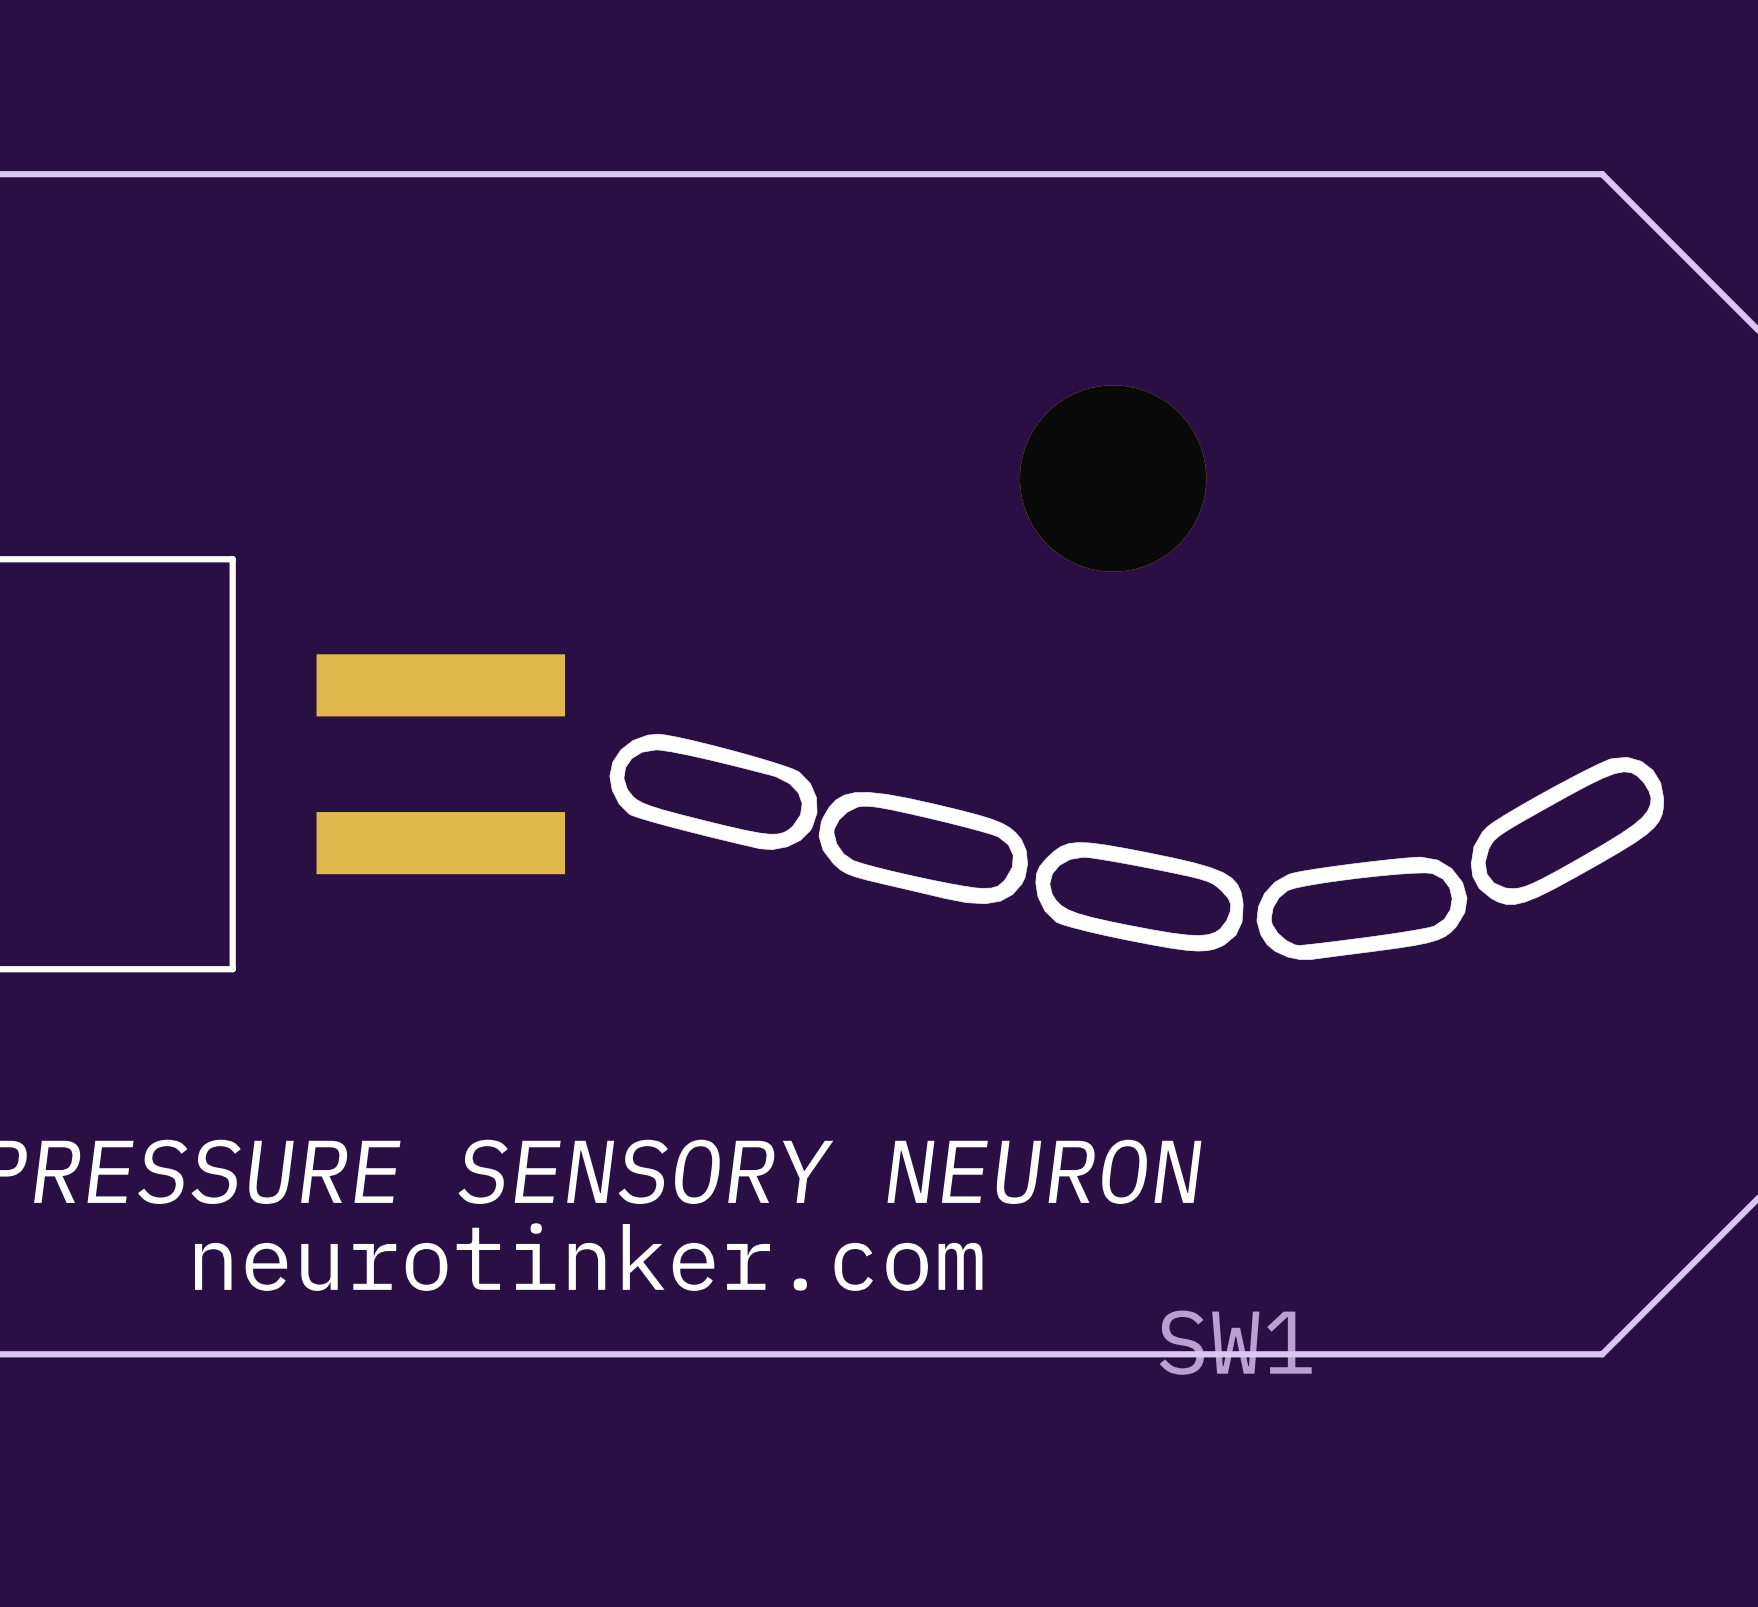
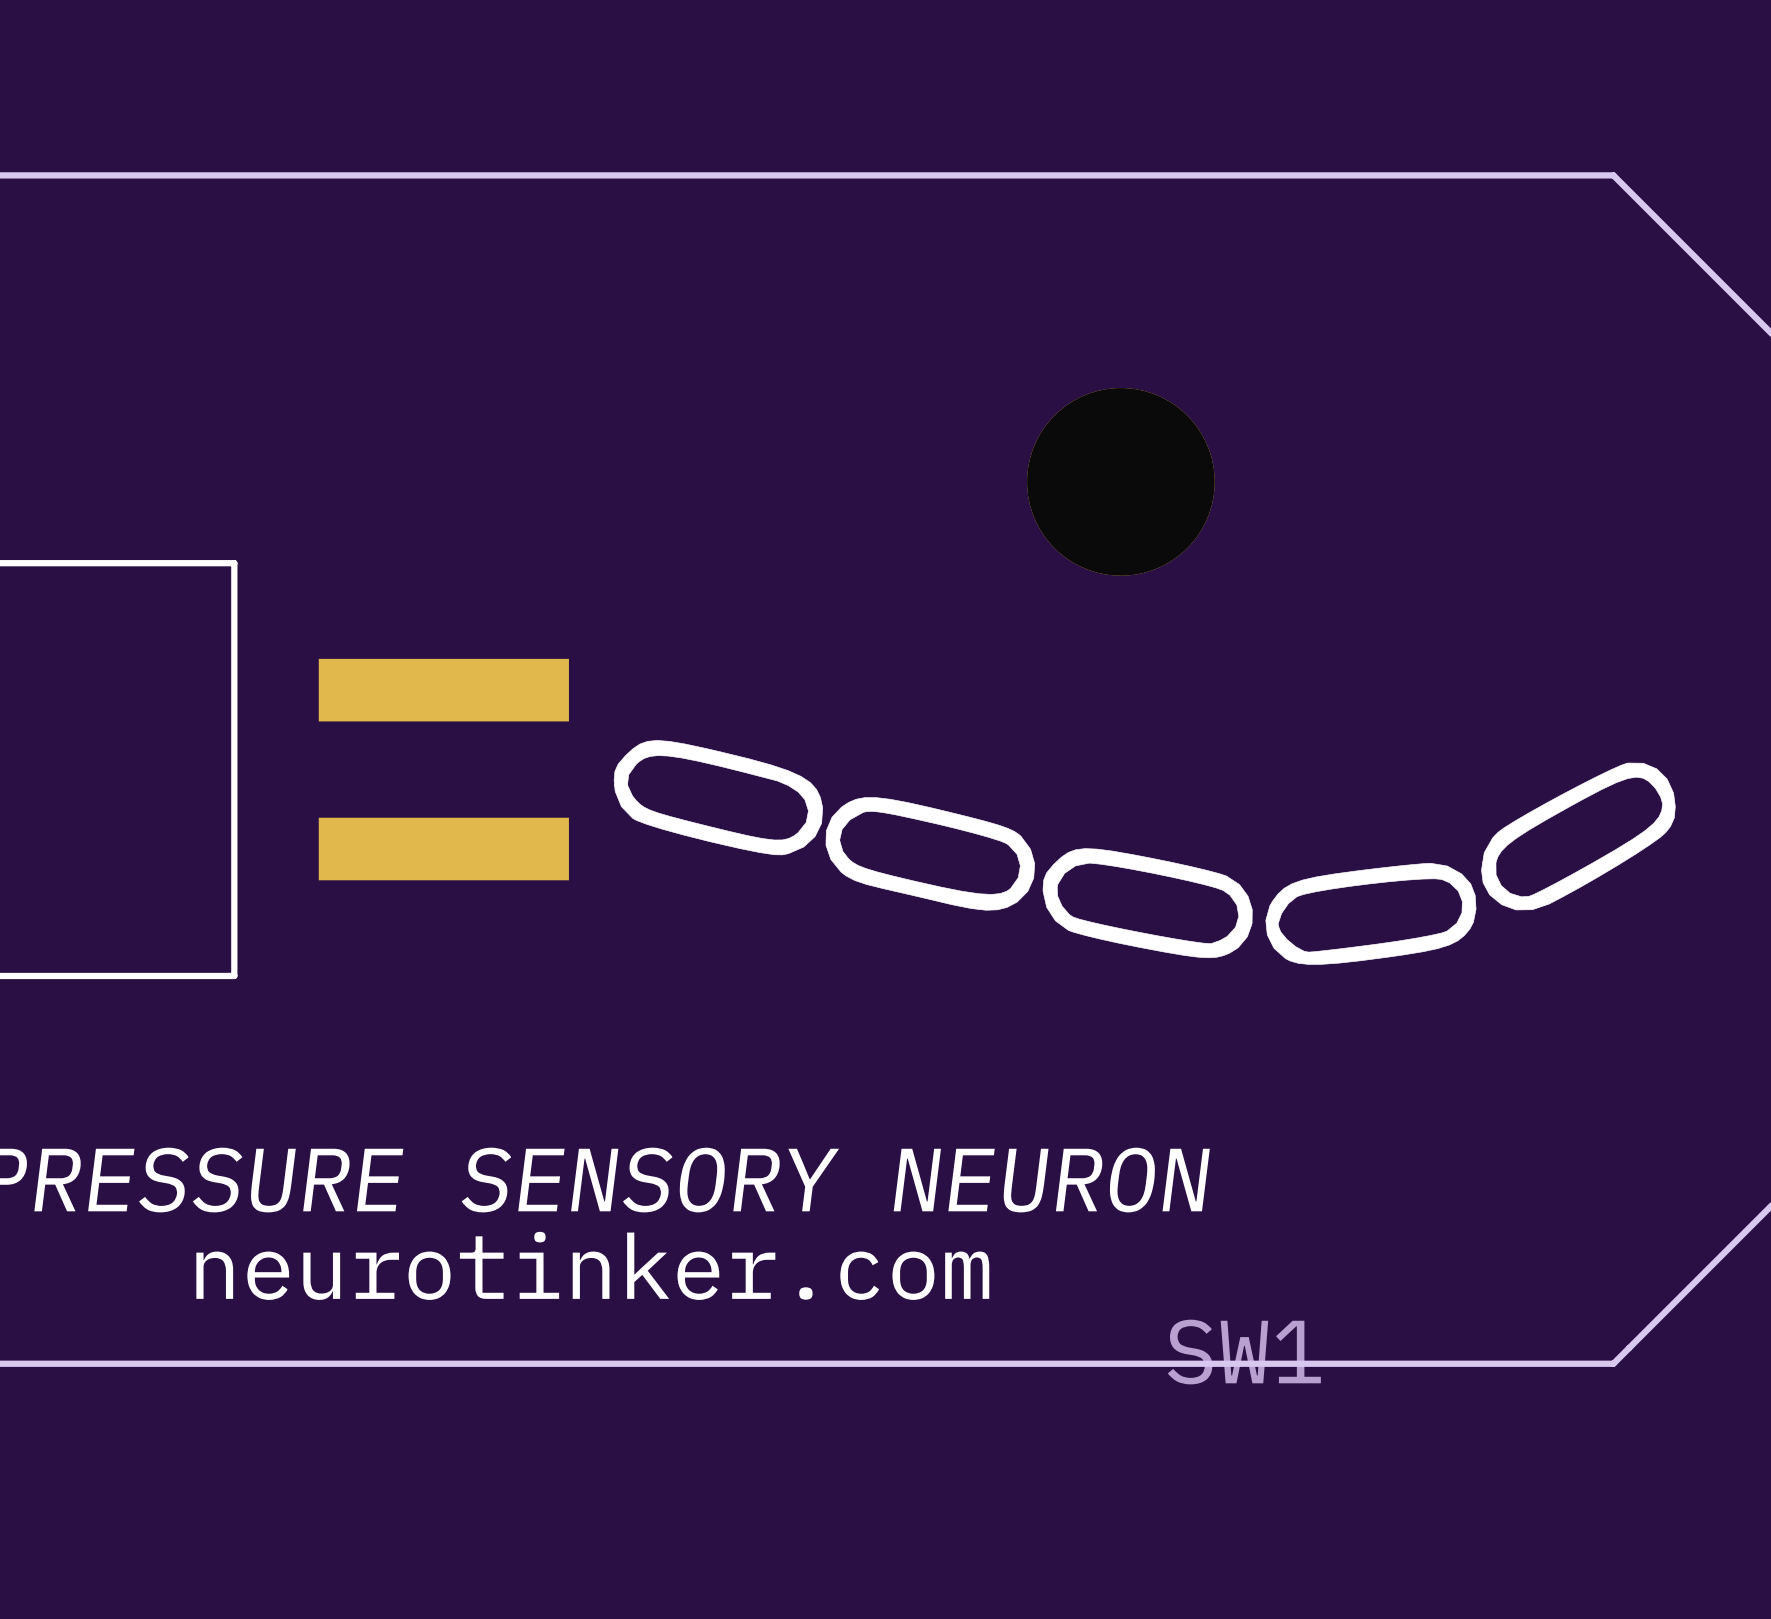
drawing shape: [609, 733, 1665, 960] -> [613, 740, 1676, 965]

